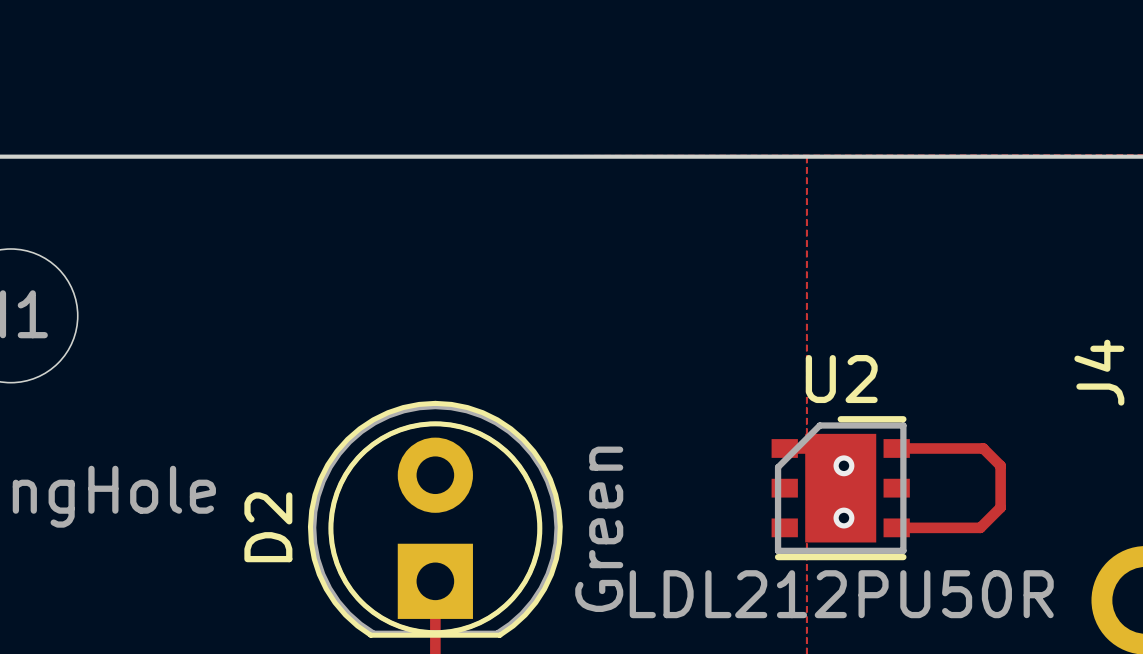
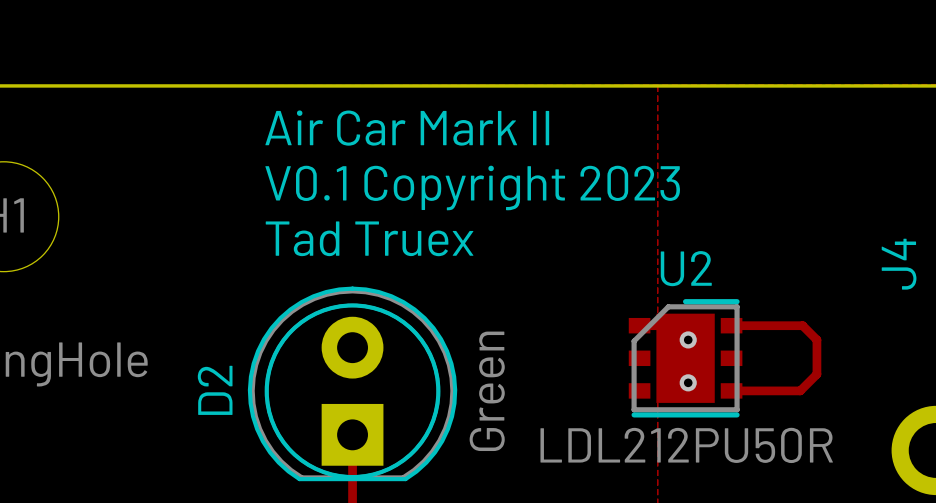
text: none -> Air Car Mark II (407, 128)
text: none -> V0.1 Copyright 2023 (472, 187)
text: none -> Tad Truex (369, 238)

